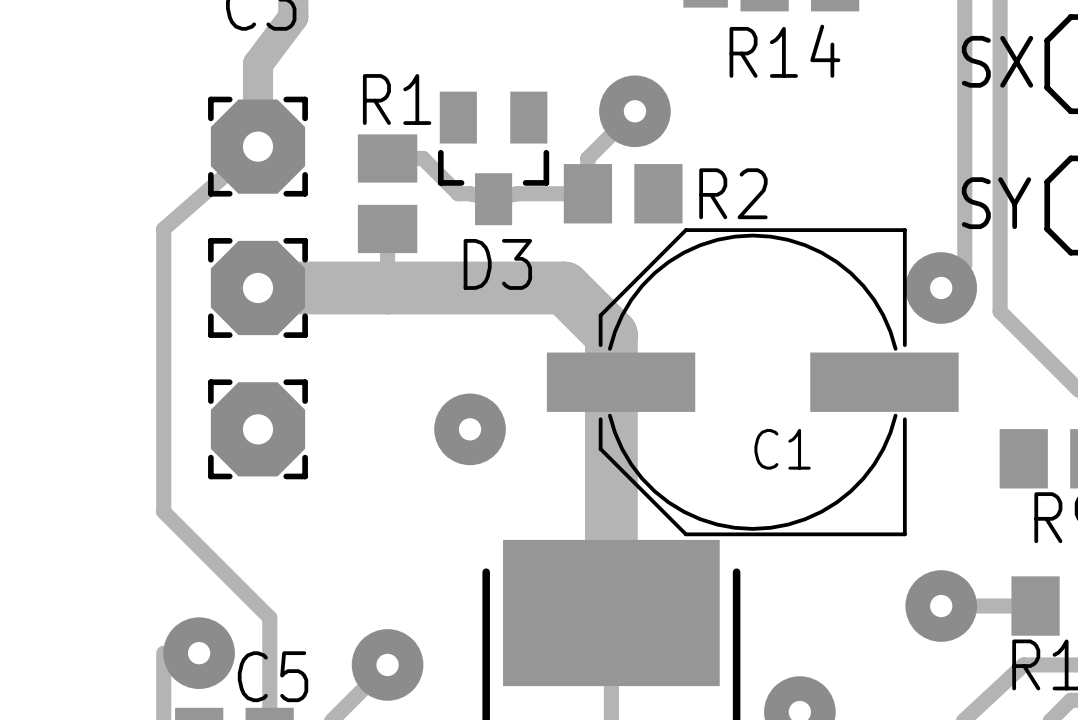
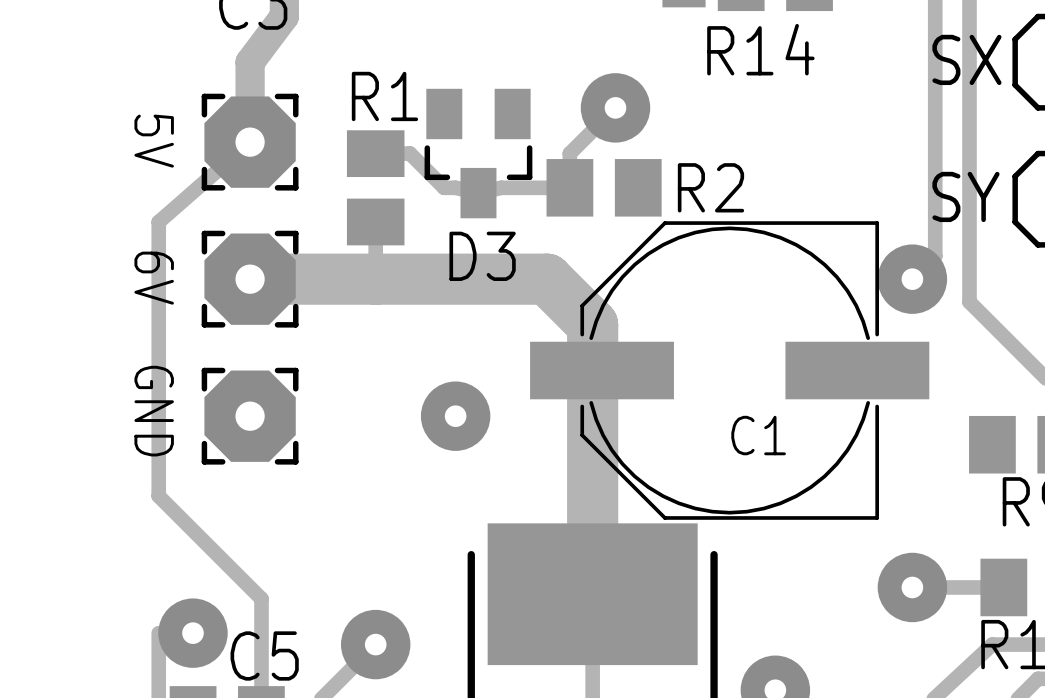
text: none -> 5V (154, 141)
text: none -> 6V (154, 278)
text: none -> GND (154, 411)

